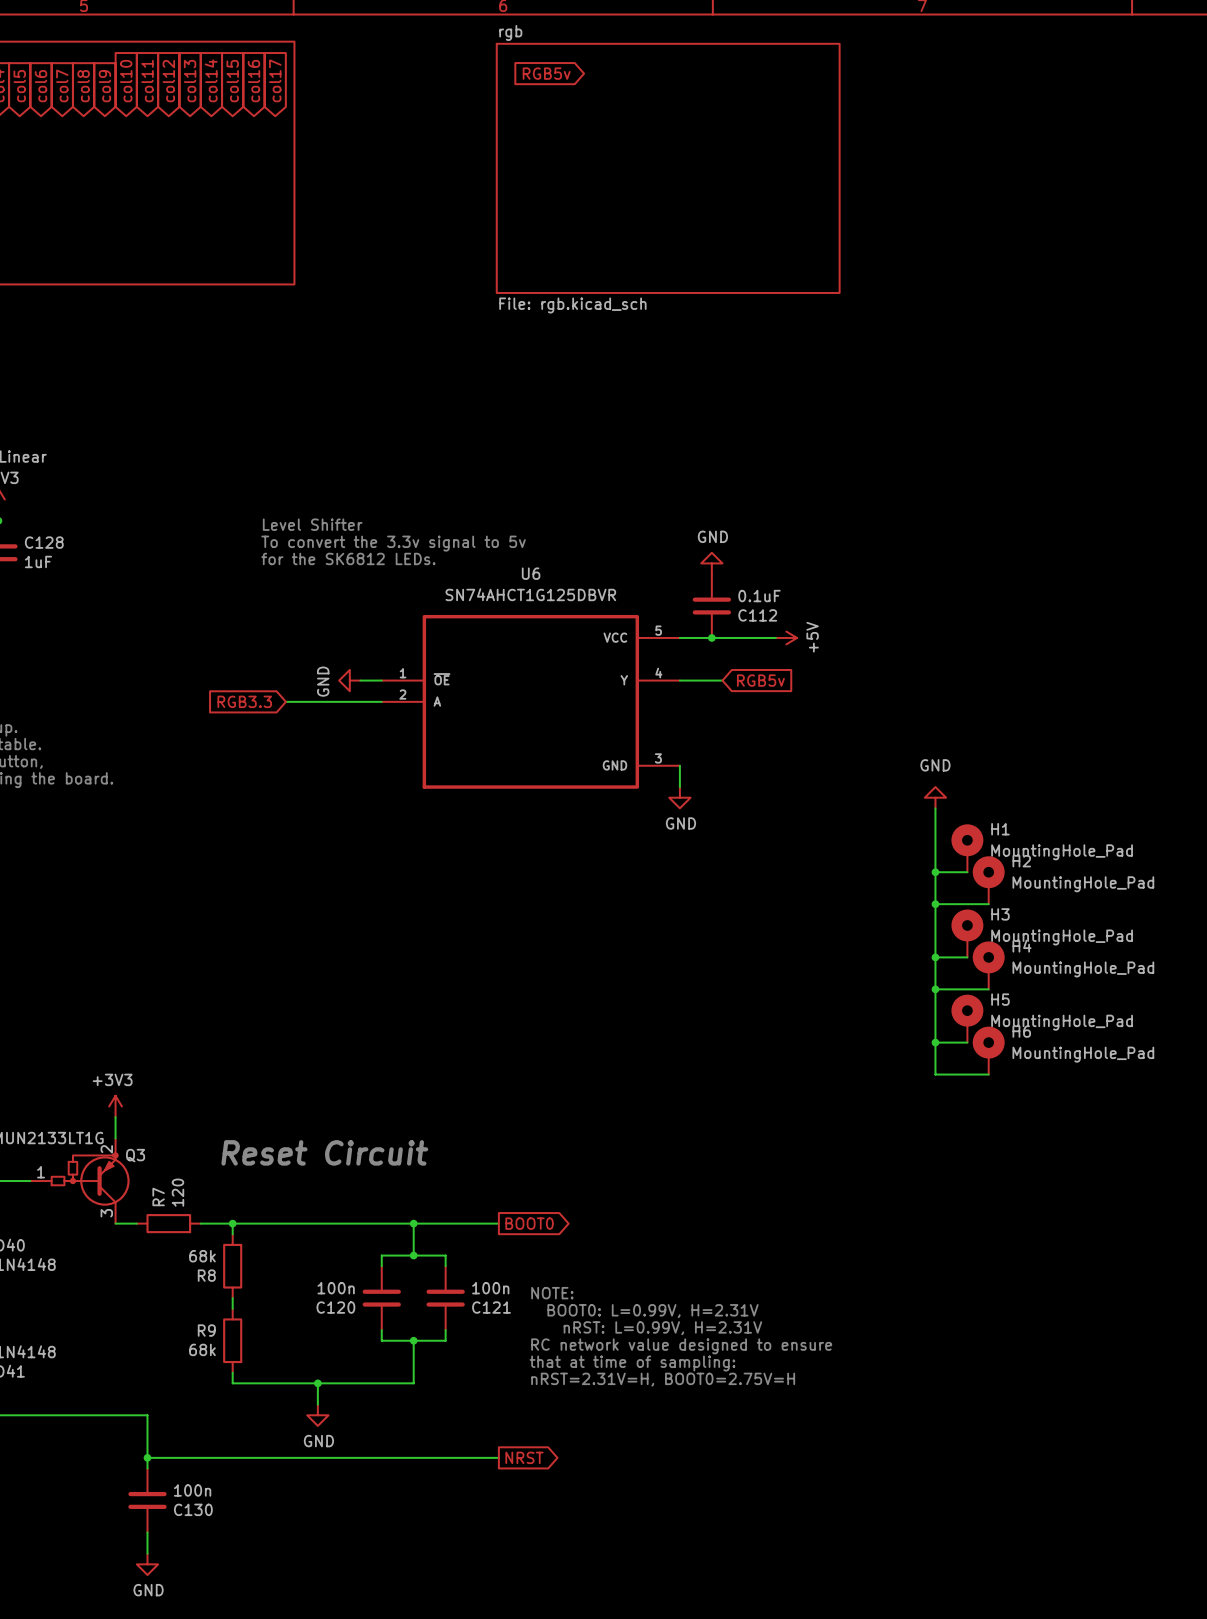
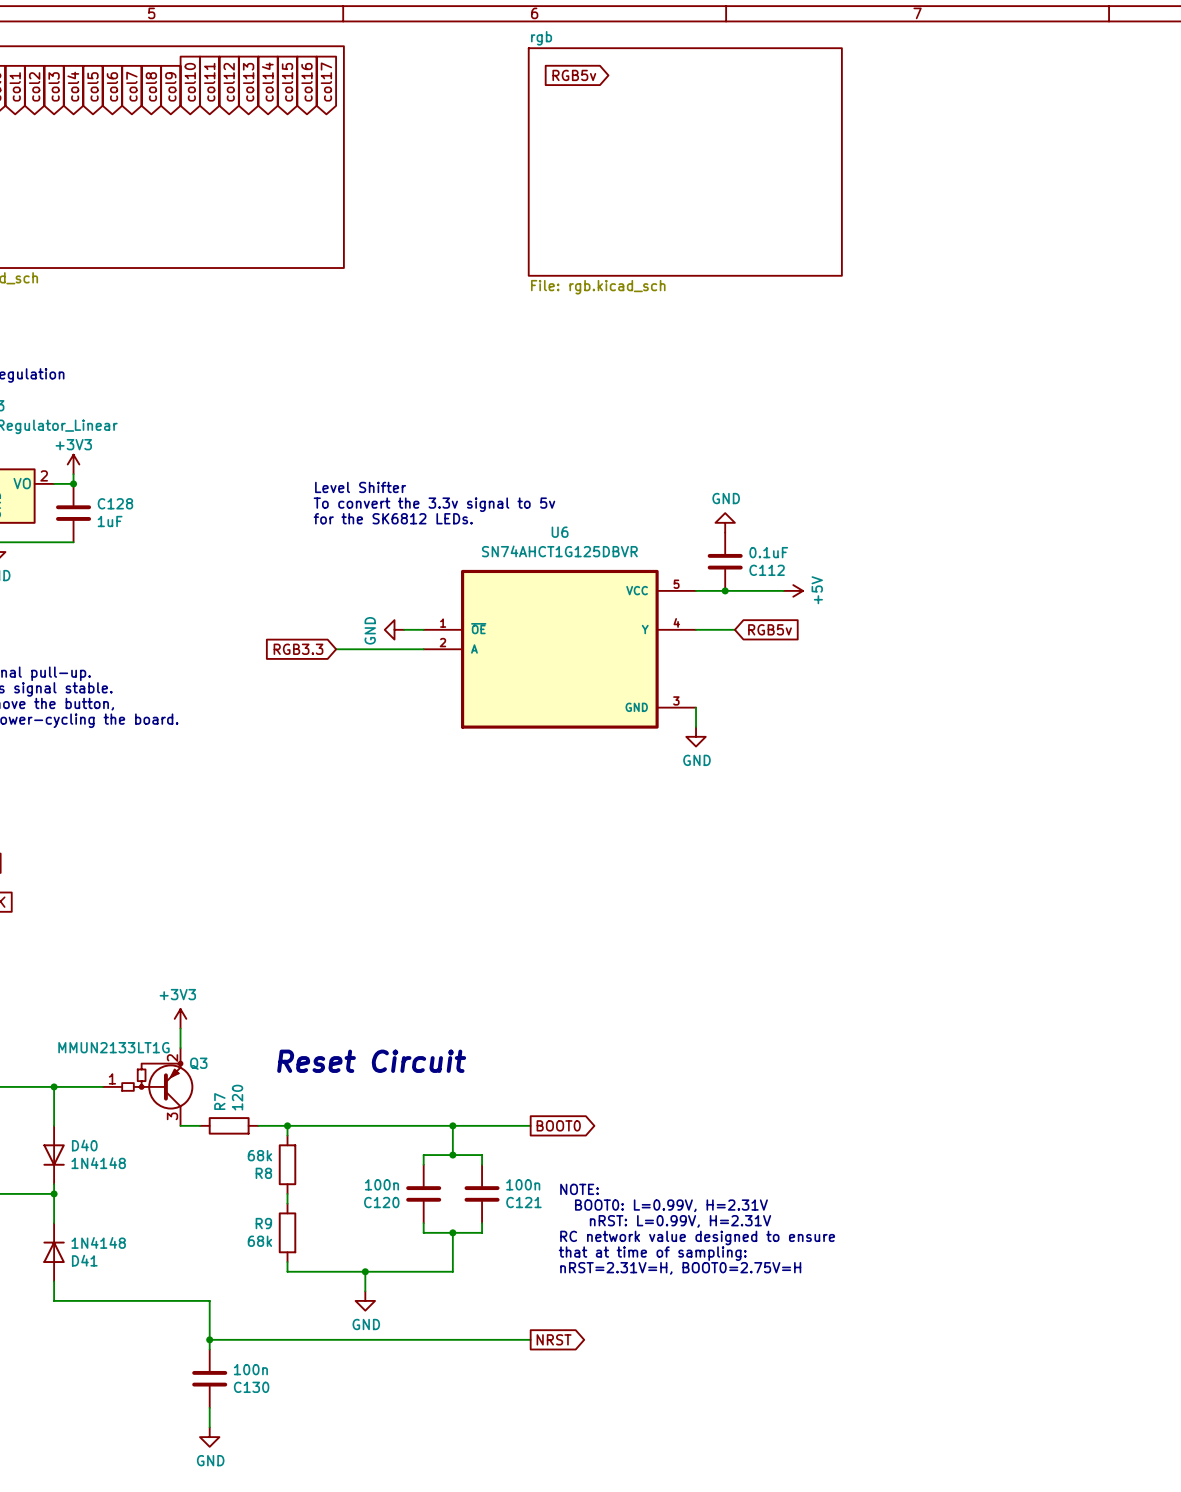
power symbol: GND (935, 797) -> none
wire: (935, 808) (935, 1074) (988, 1074) -> none
H1: MountingHole_Pad (967, 848) -> none
wire: (935, 872) (967, 872) -> none
junction: (935, 872) -> none
H2: MountingHole_Pad (988, 880) -> none
wire: (935, 904) (988, 904) -> none
junction: (935, 904) -> none
H3: MountingHole_Pad (967, 933) -> none
wire: (935, 957) (967, 957) -> none
junction: (935, 957) -> none
H4: MountingHole_Pad (988, 965) -> none
wire: (935, 989) (988, 989) -> none
junction: (935, 989) -> none
H5: MountingHole_Pad (967, 1018) -> none
wire: (935, 1042) (967, 1042) -> none
junction: (935, 1042) -> none
H6: MountingHole_Pad (988, 1050) -> none

